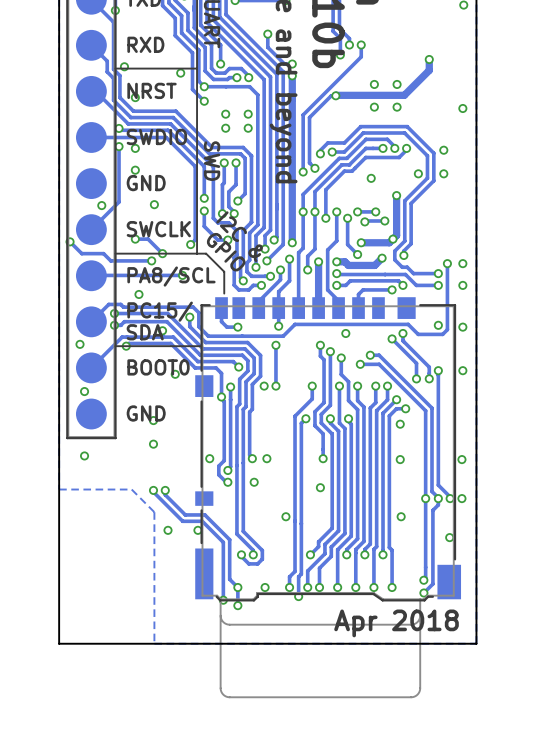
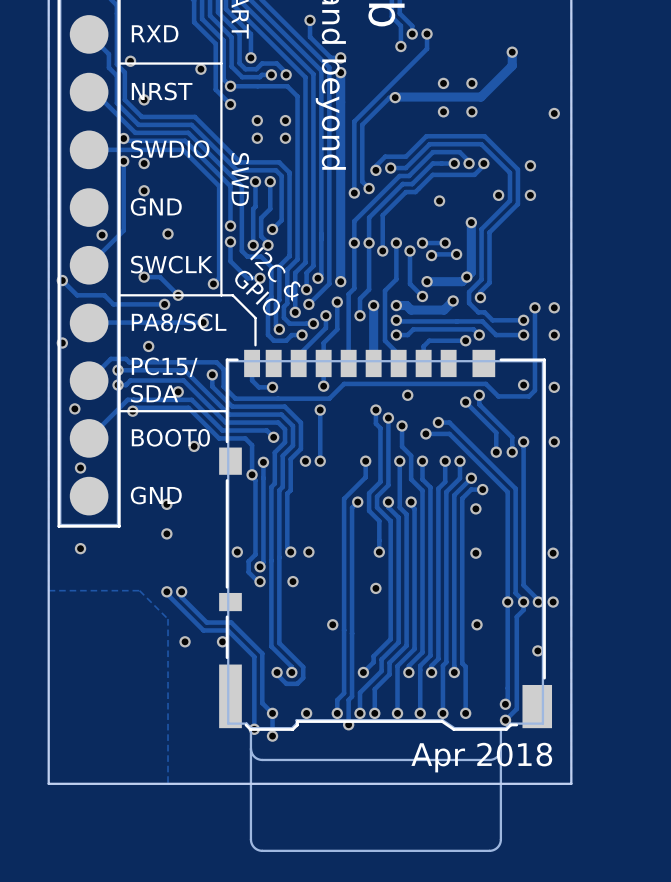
via: none -> (62, 343)

